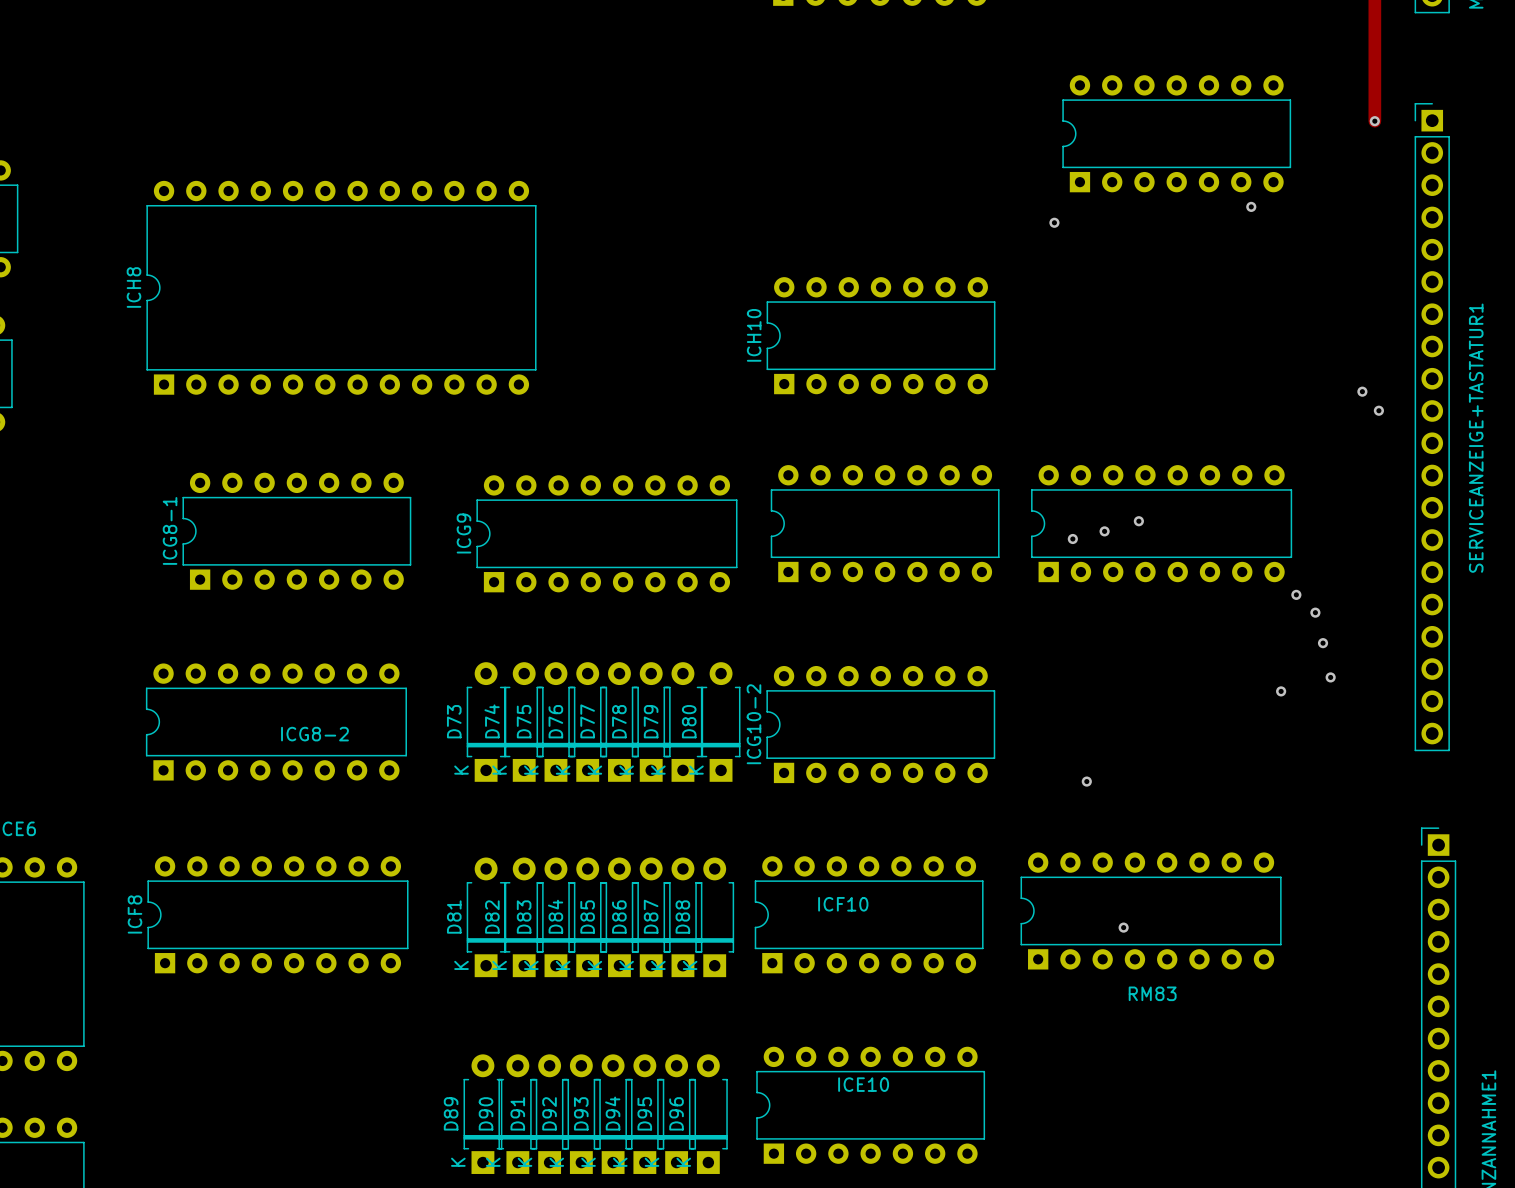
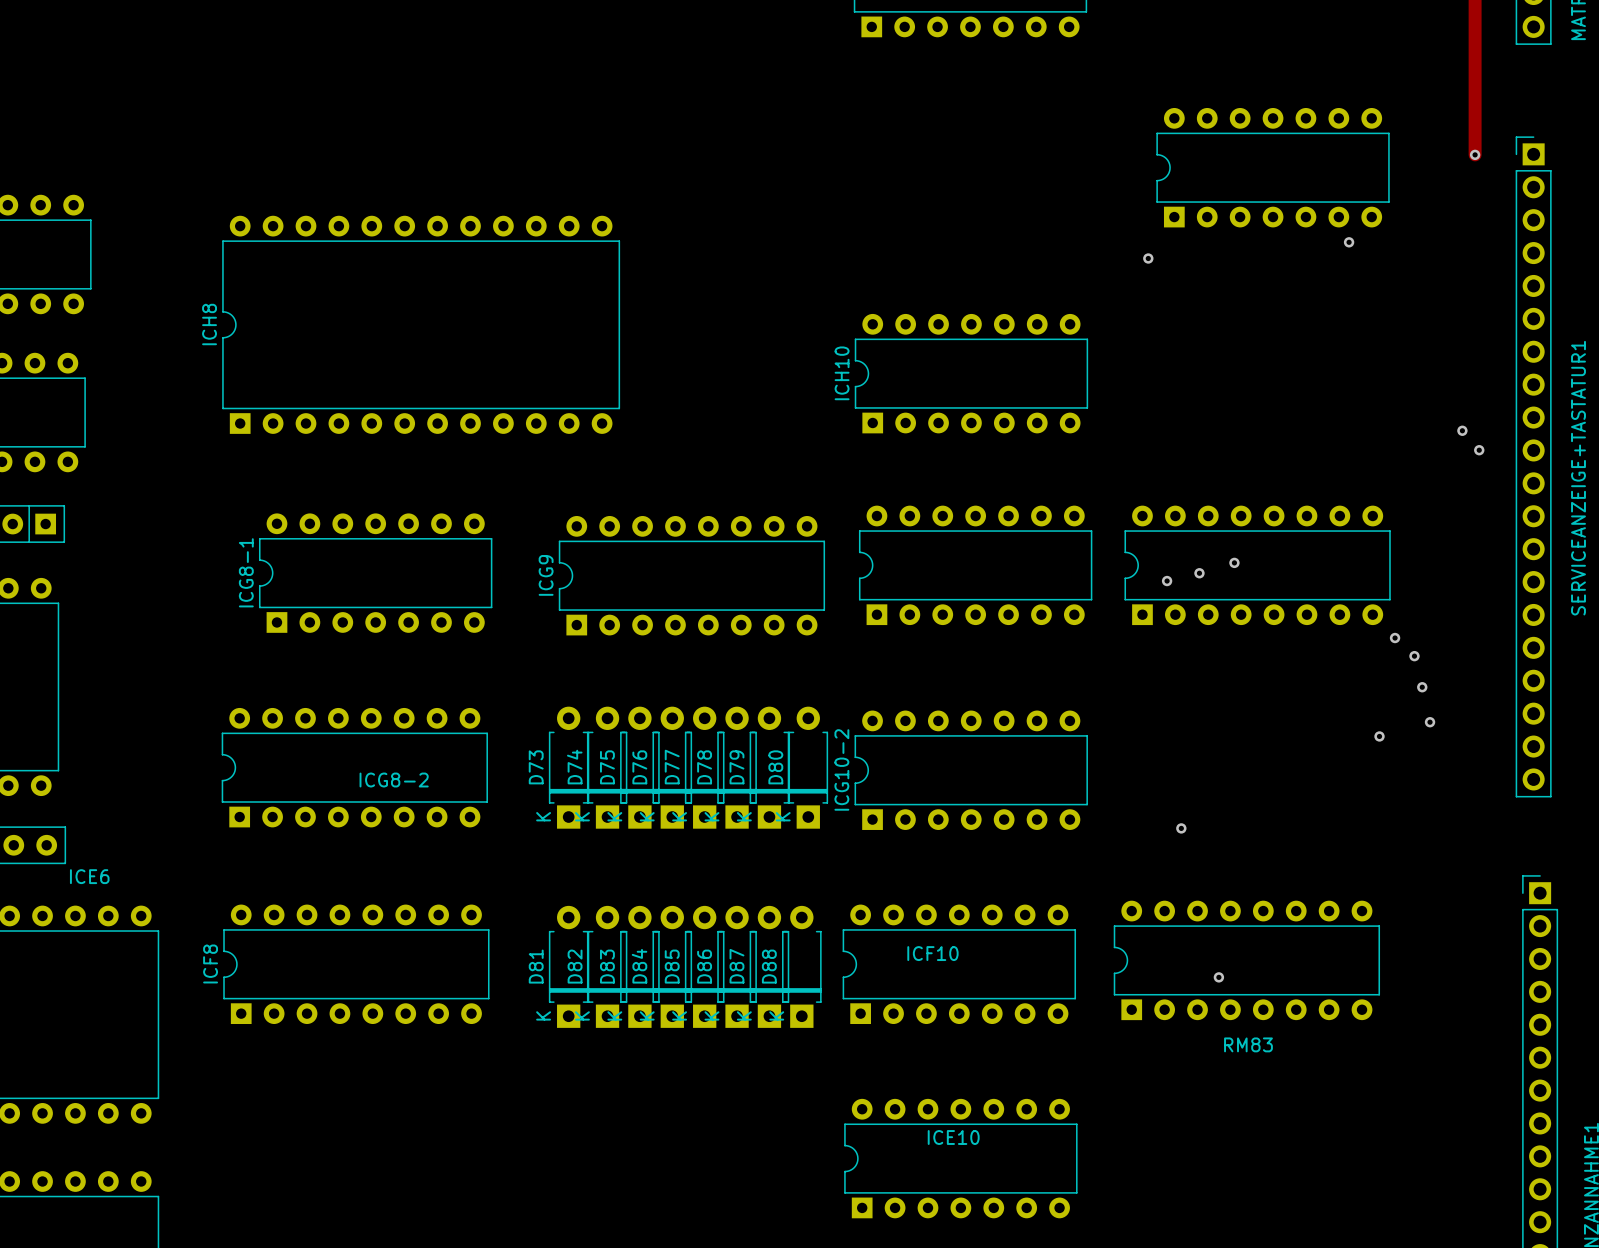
D89: (482, 1114) -> none
D90: (517, 1114) -> none
D91: (549, 1114) -> none
D92: (581, 1114) -> none
D93: (613, 1114) -> none
D94: (644, 1114) -> none
D95: (676, 1114) -> none
D96: (708, 1114) -> none

